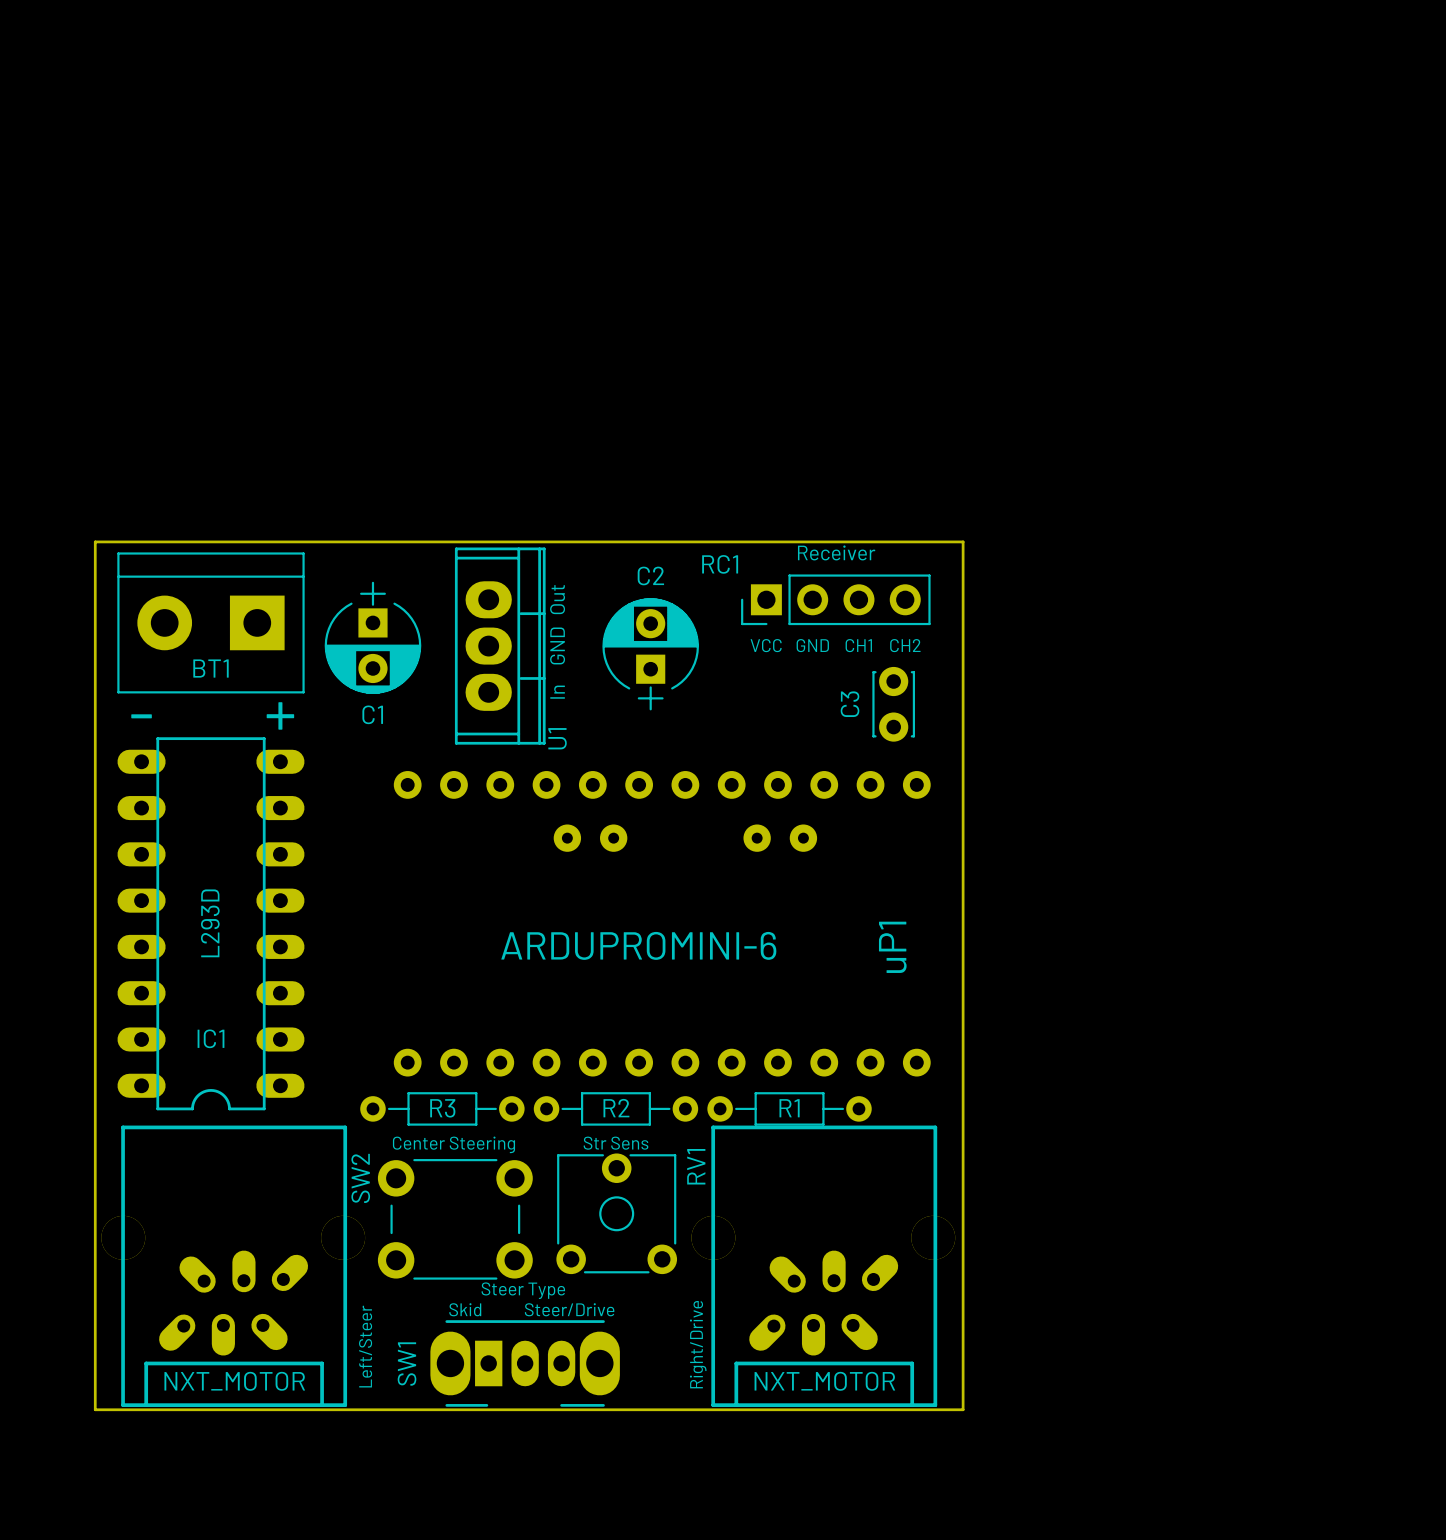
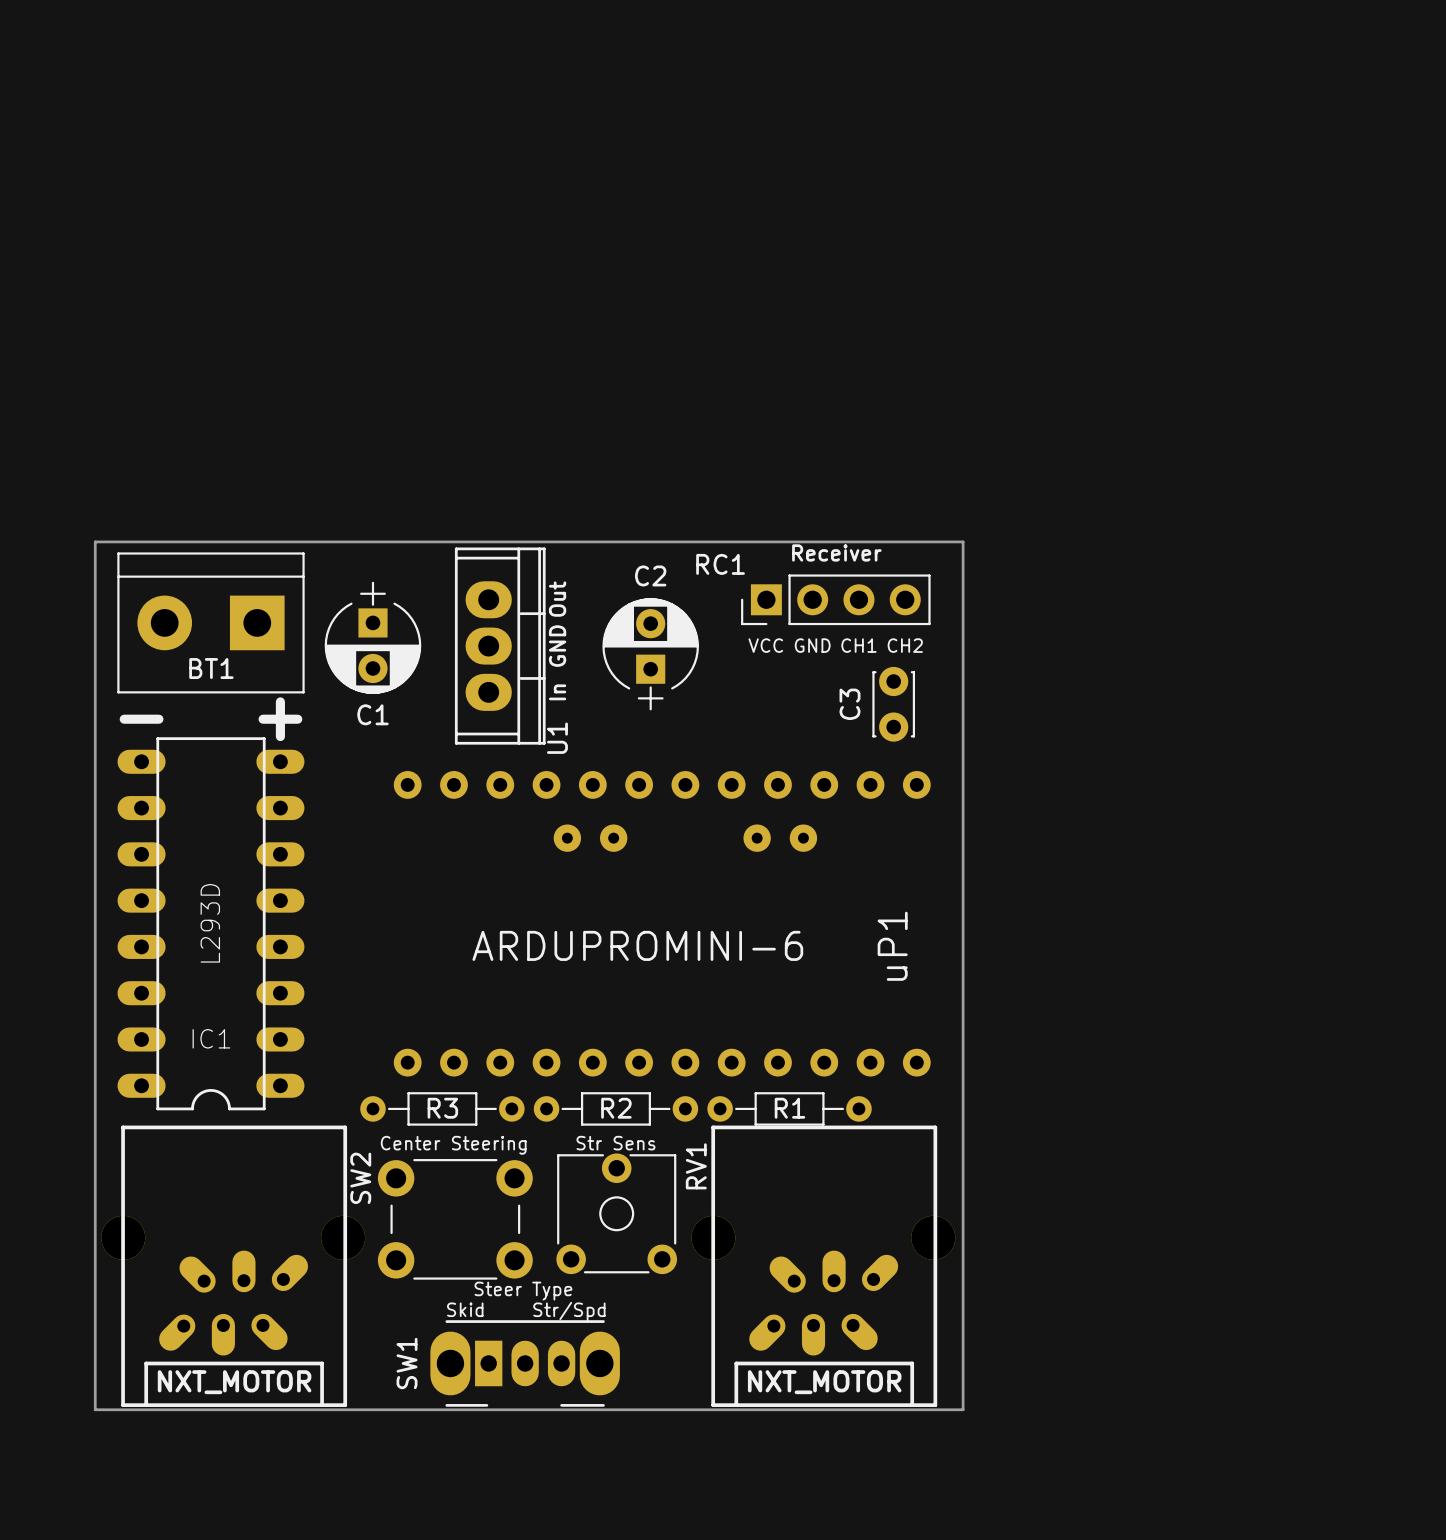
text: Steer/Drive (569, 1309) -> Str/Spd (569, 1311)
text: Right/Drive (698, 1344) -> none
text: Left/Steer (365, 1346) -> none

